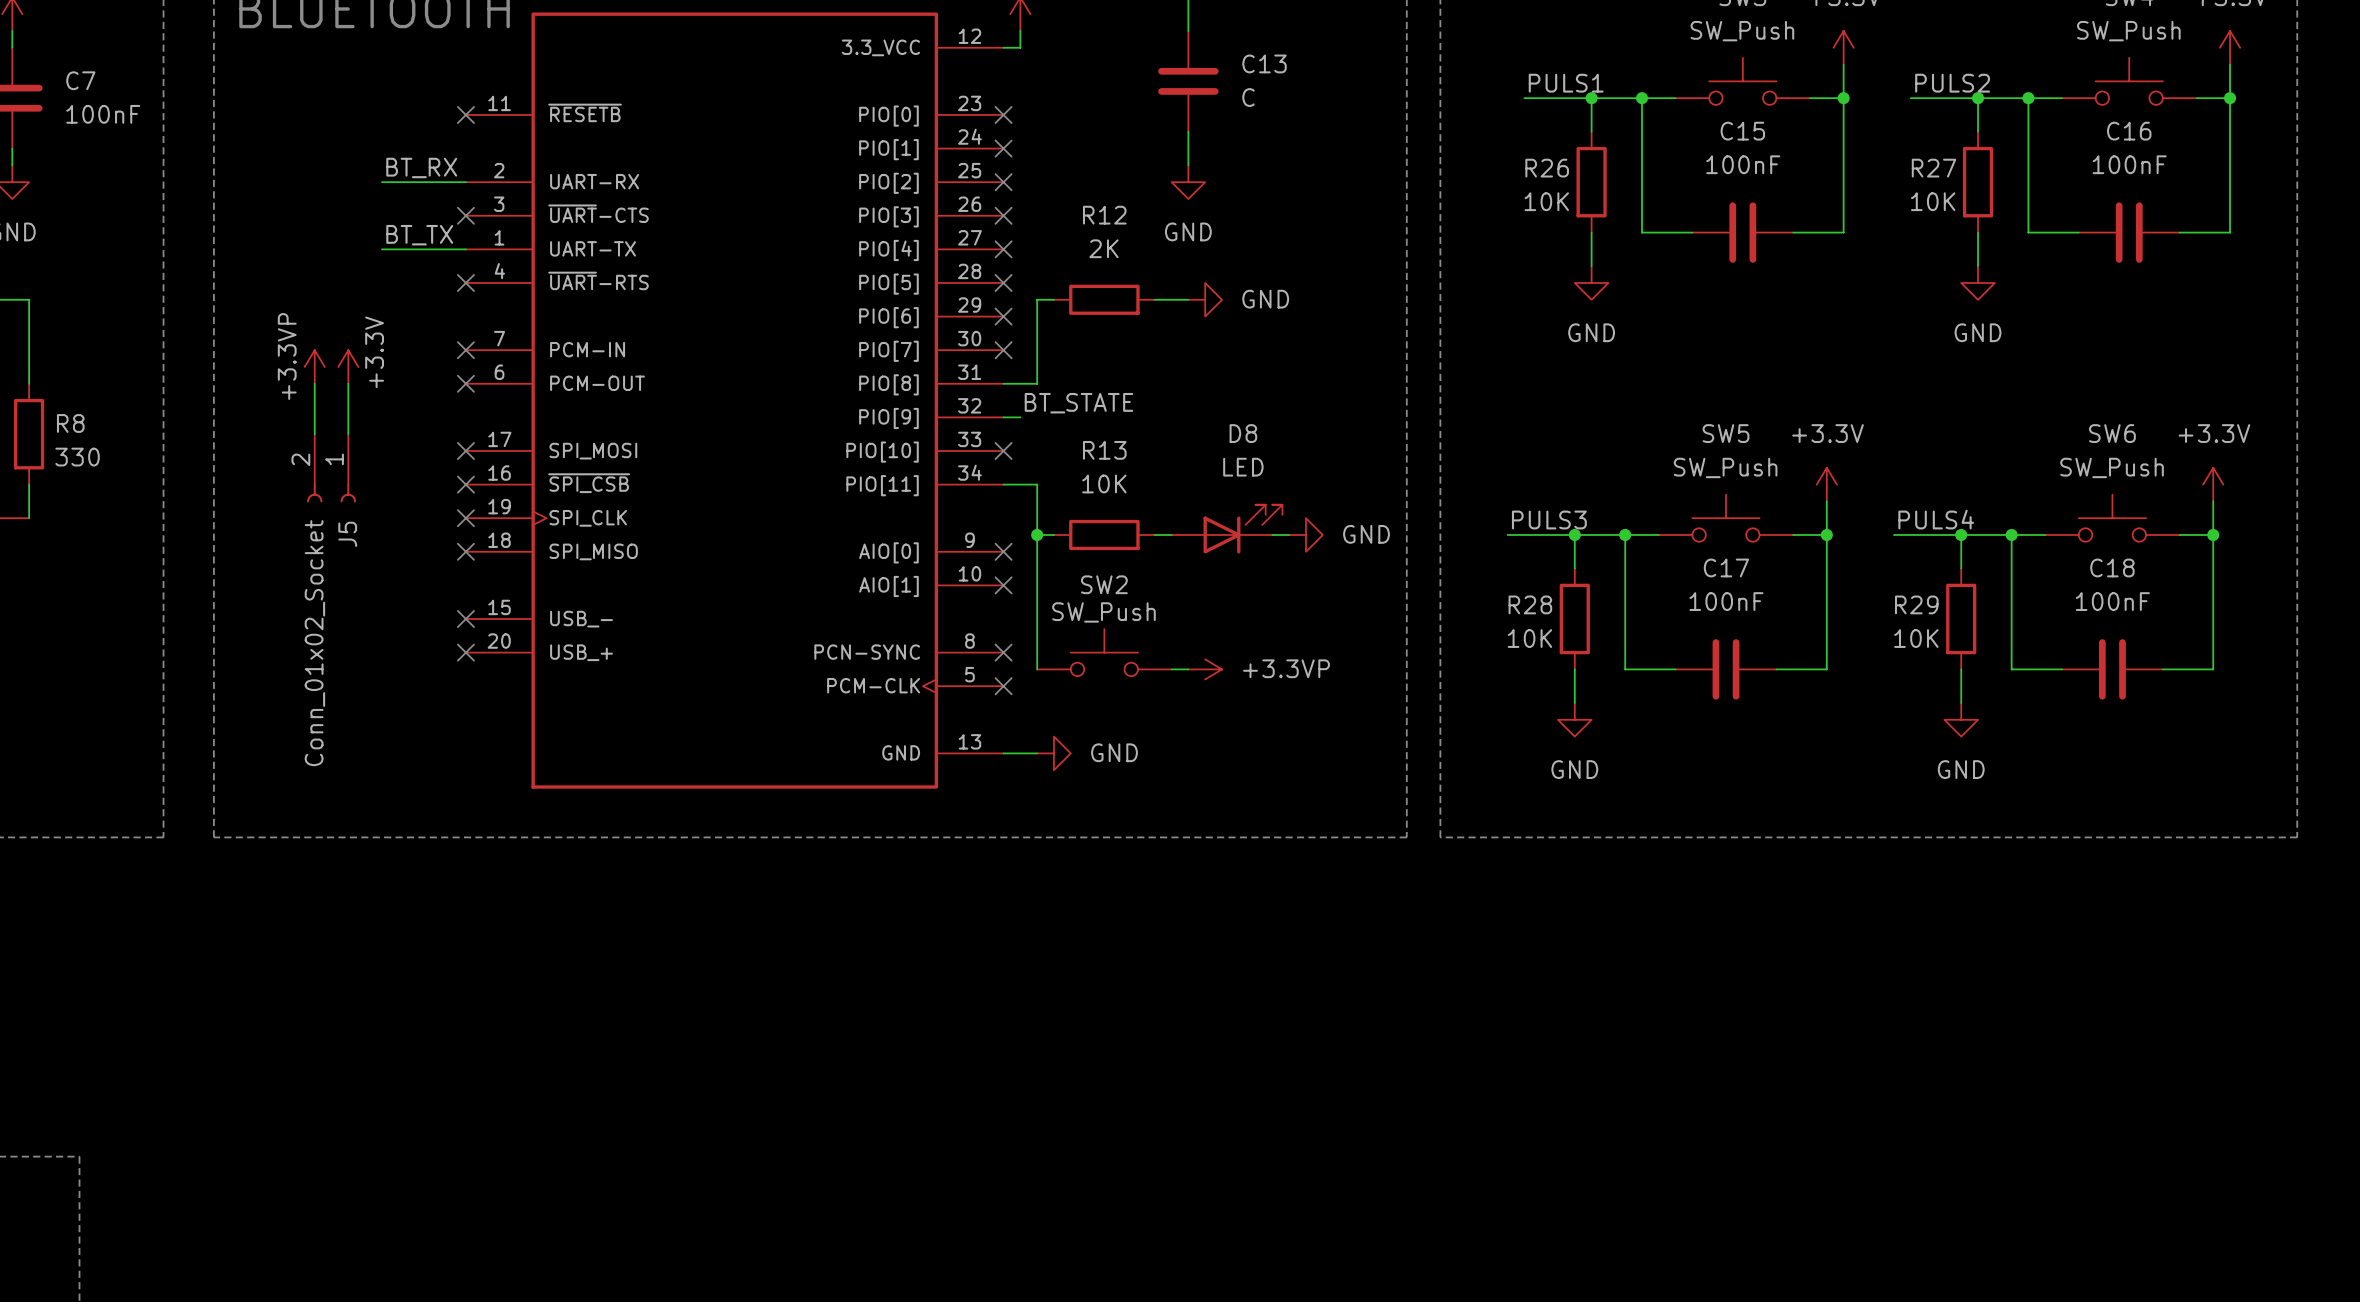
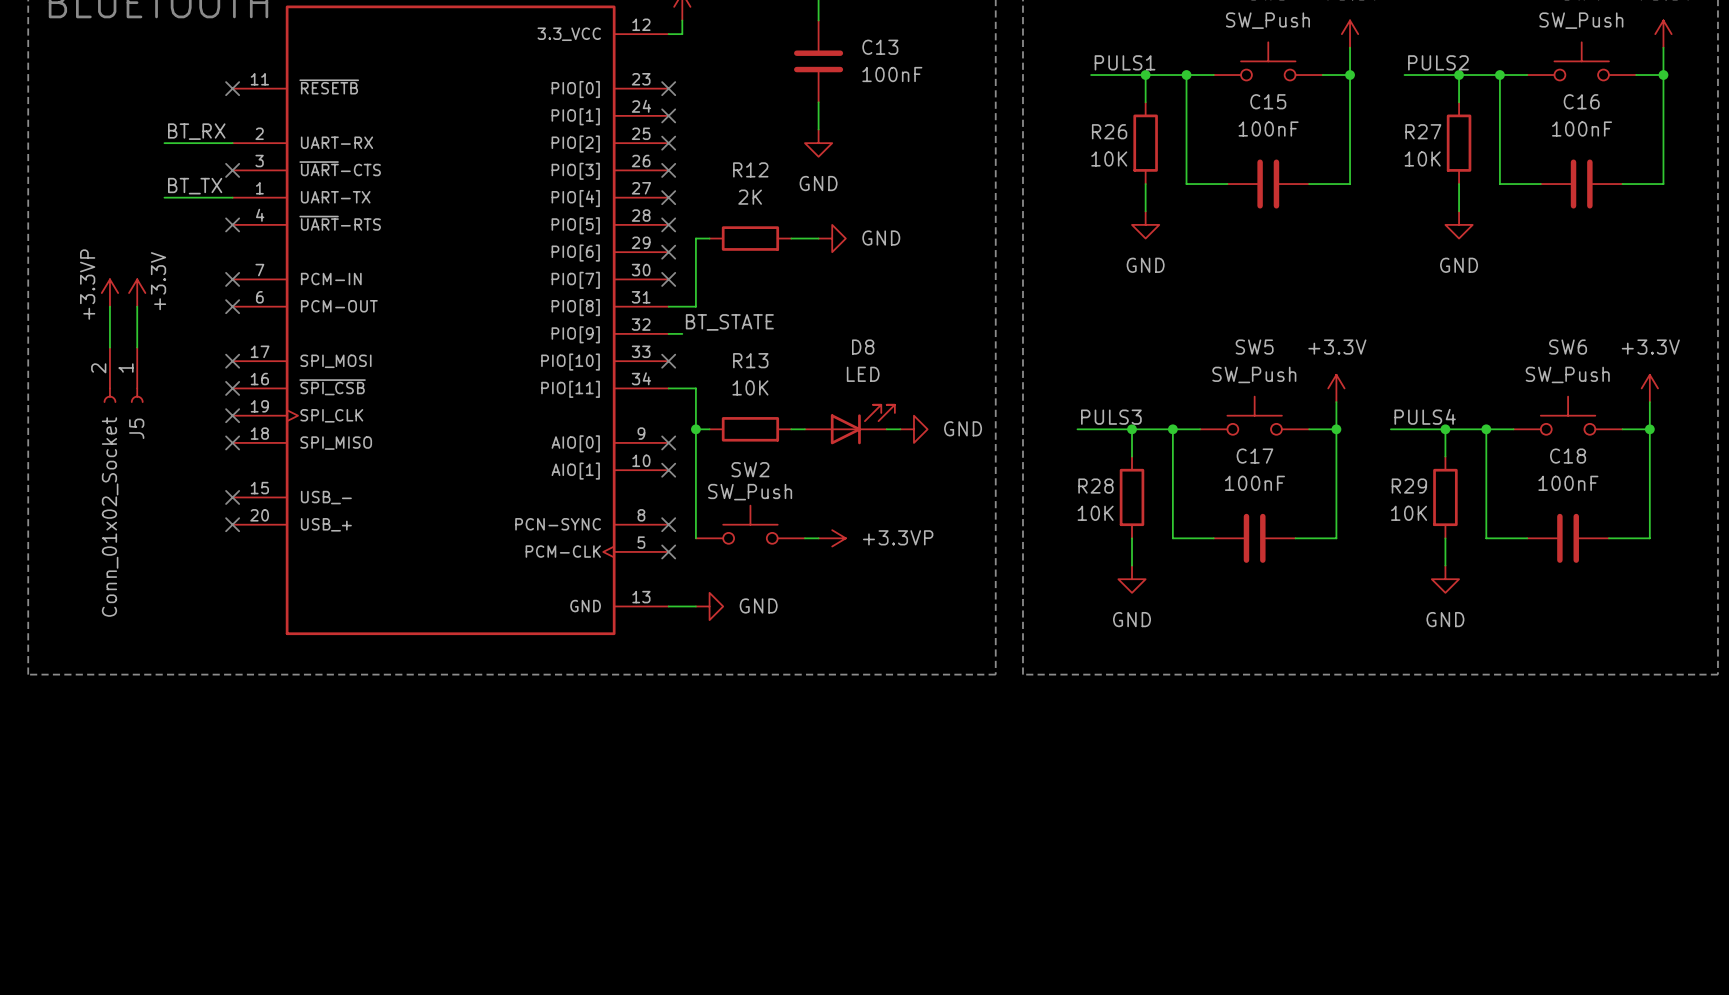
C13 value: C (1248, 97) -> 100nF (892, 74)

